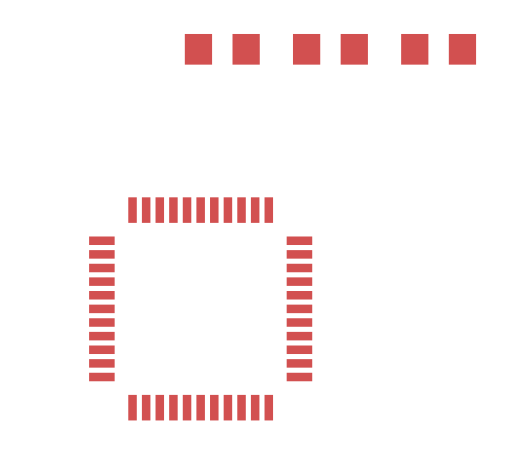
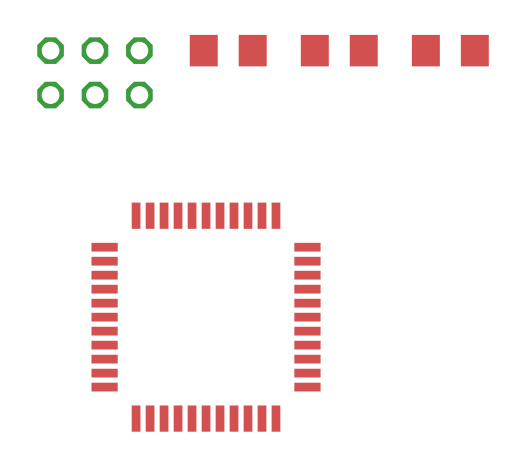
part: none -> (94, 72)

